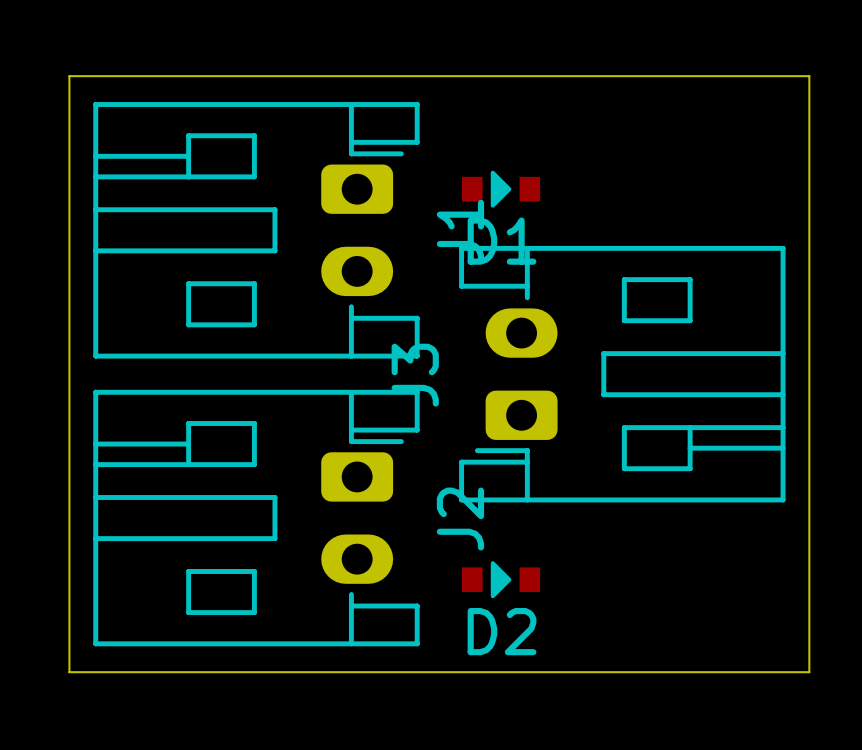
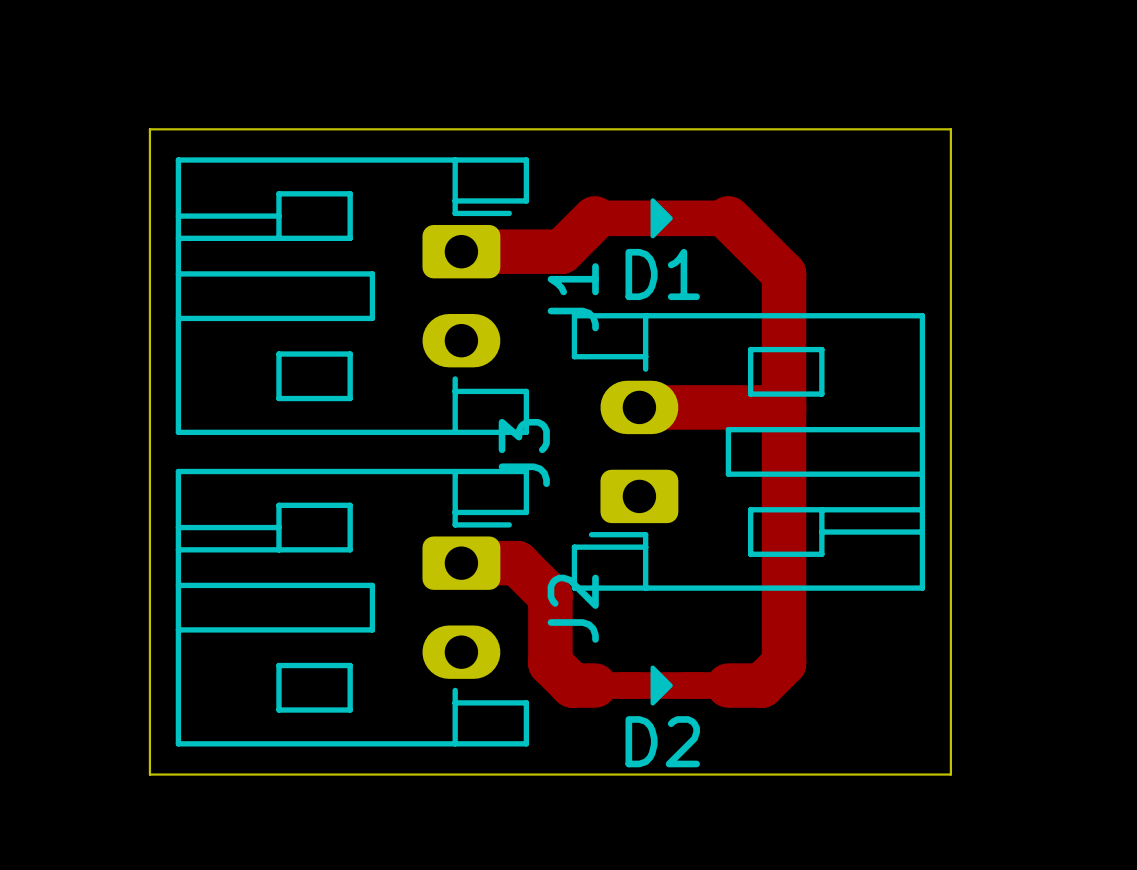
track: none -> (461, 251) (561, 251) (594, 218) (728, 218) (784, 273) (784, 663) (761, 685) (572, 685) (550, 663) (550, 596) (517, 563) (461, 563)
D1 position: (501, 189) -> (661, 218)
track: none -> (639, 407) (784, 407)
D2 position: (501, 579) -> (661, 685)

